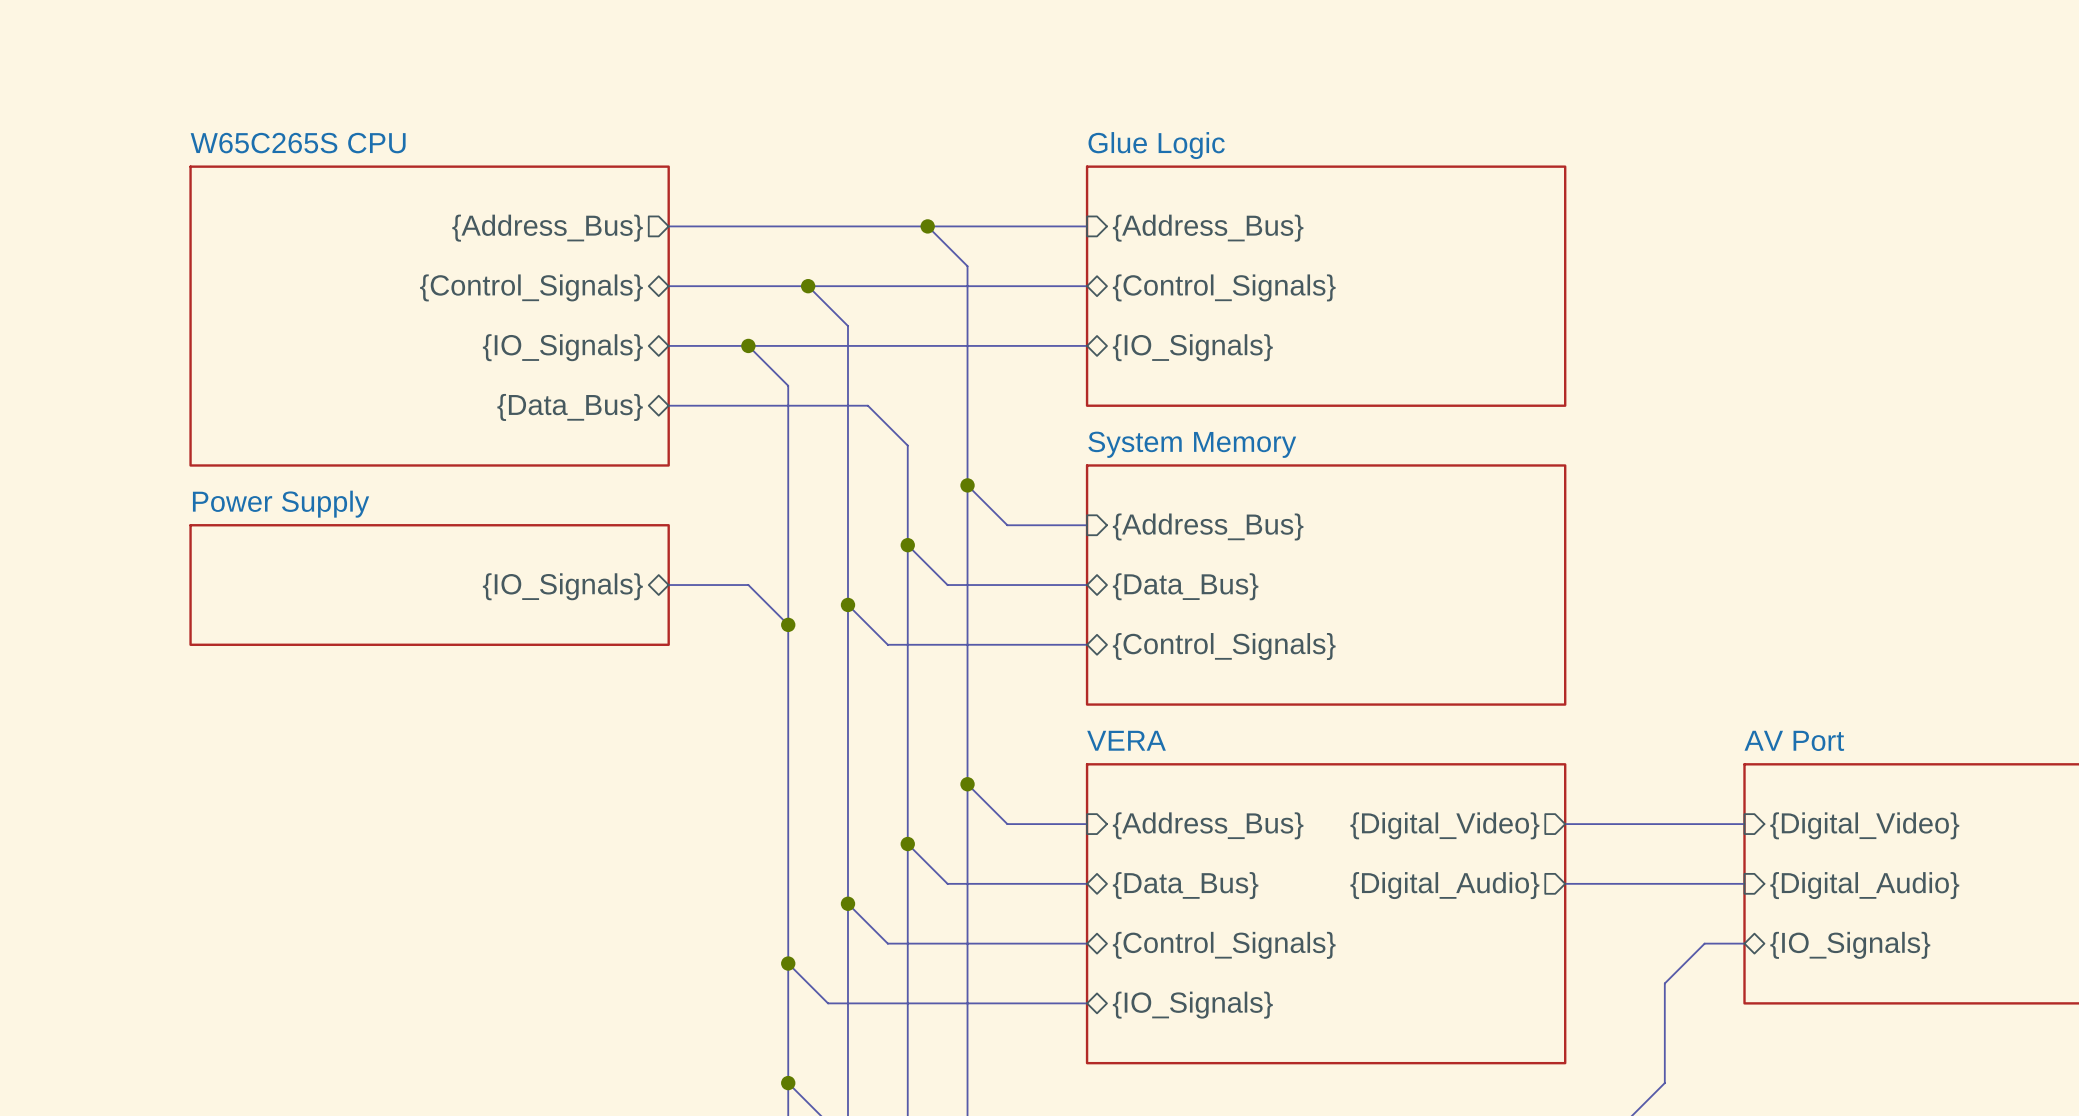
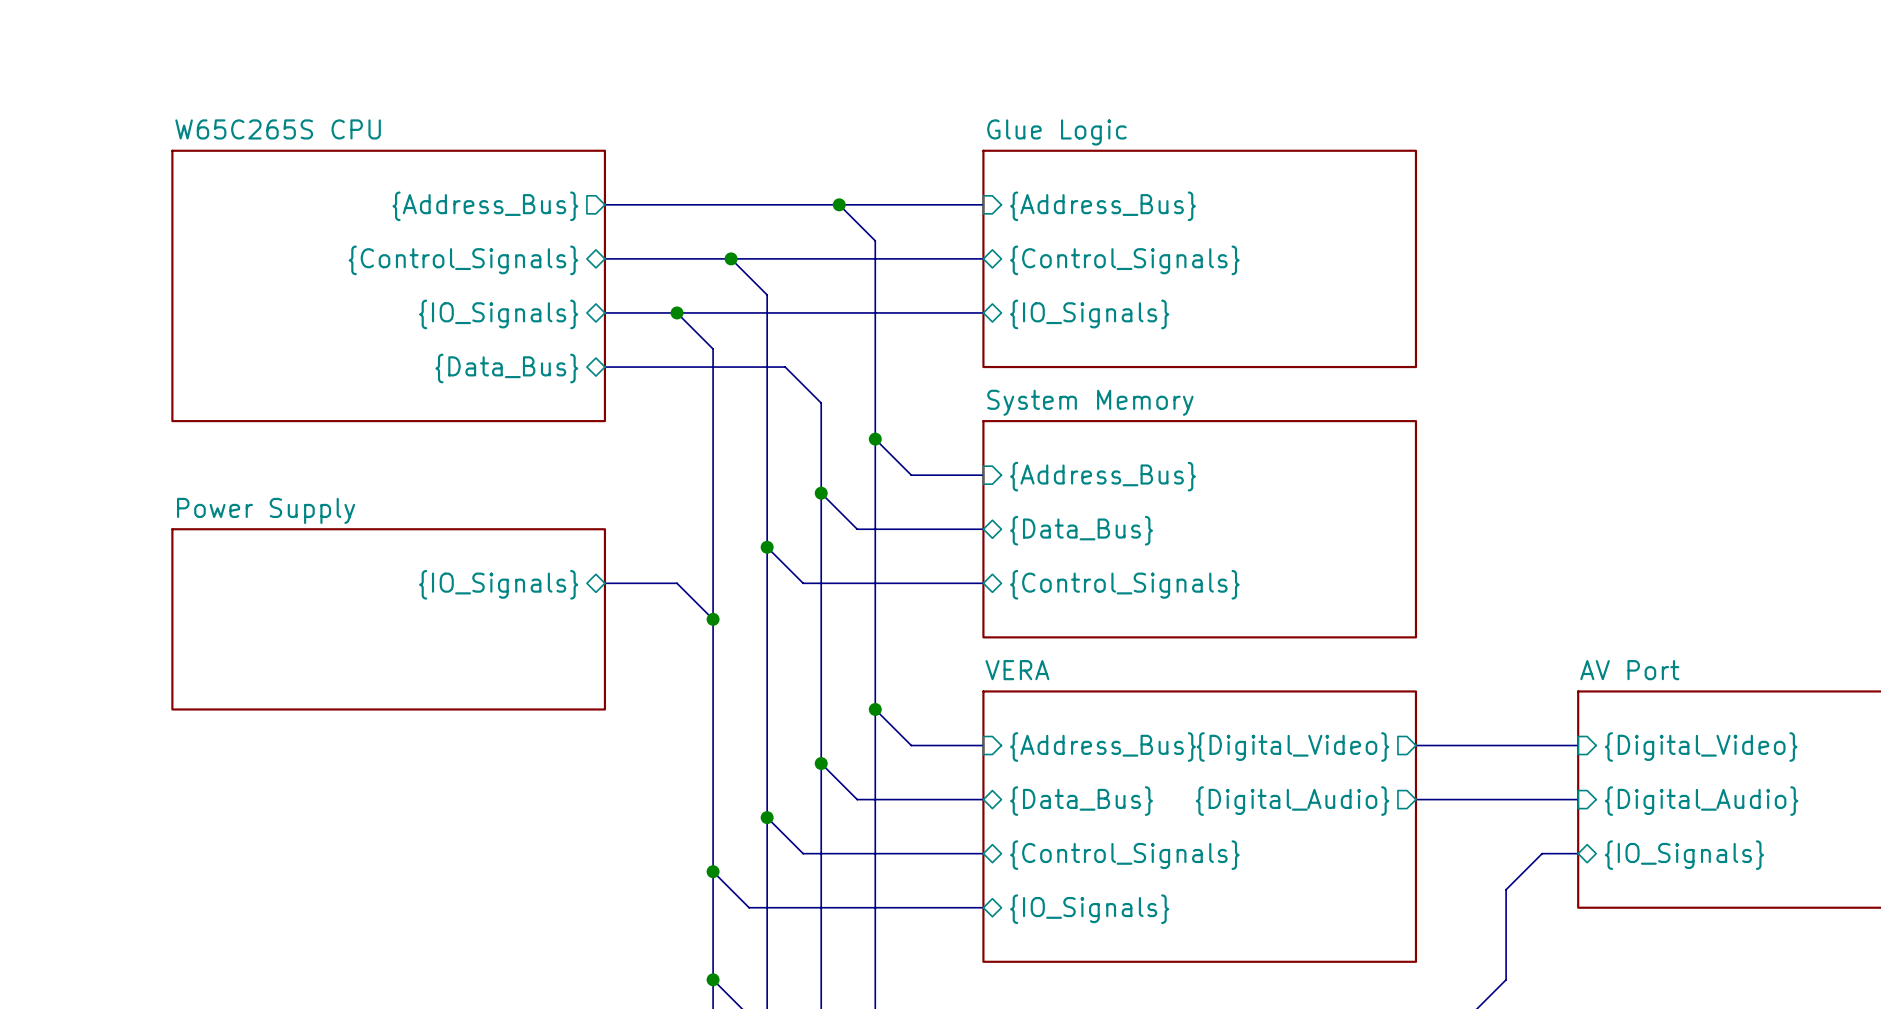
sheet Power Supply: (429, 585) -> none
bus: (668, 585) (748, 585) (788, 624) -> (604, 583) (677, 583) (713, 619)
sheet pin position: {IO_Signals} (562, 586) -> {IO_Signals} (498, 584)
junction position: (788, 624) -> (713, 619)
sheet Power Supply: none -> (388, 619)

